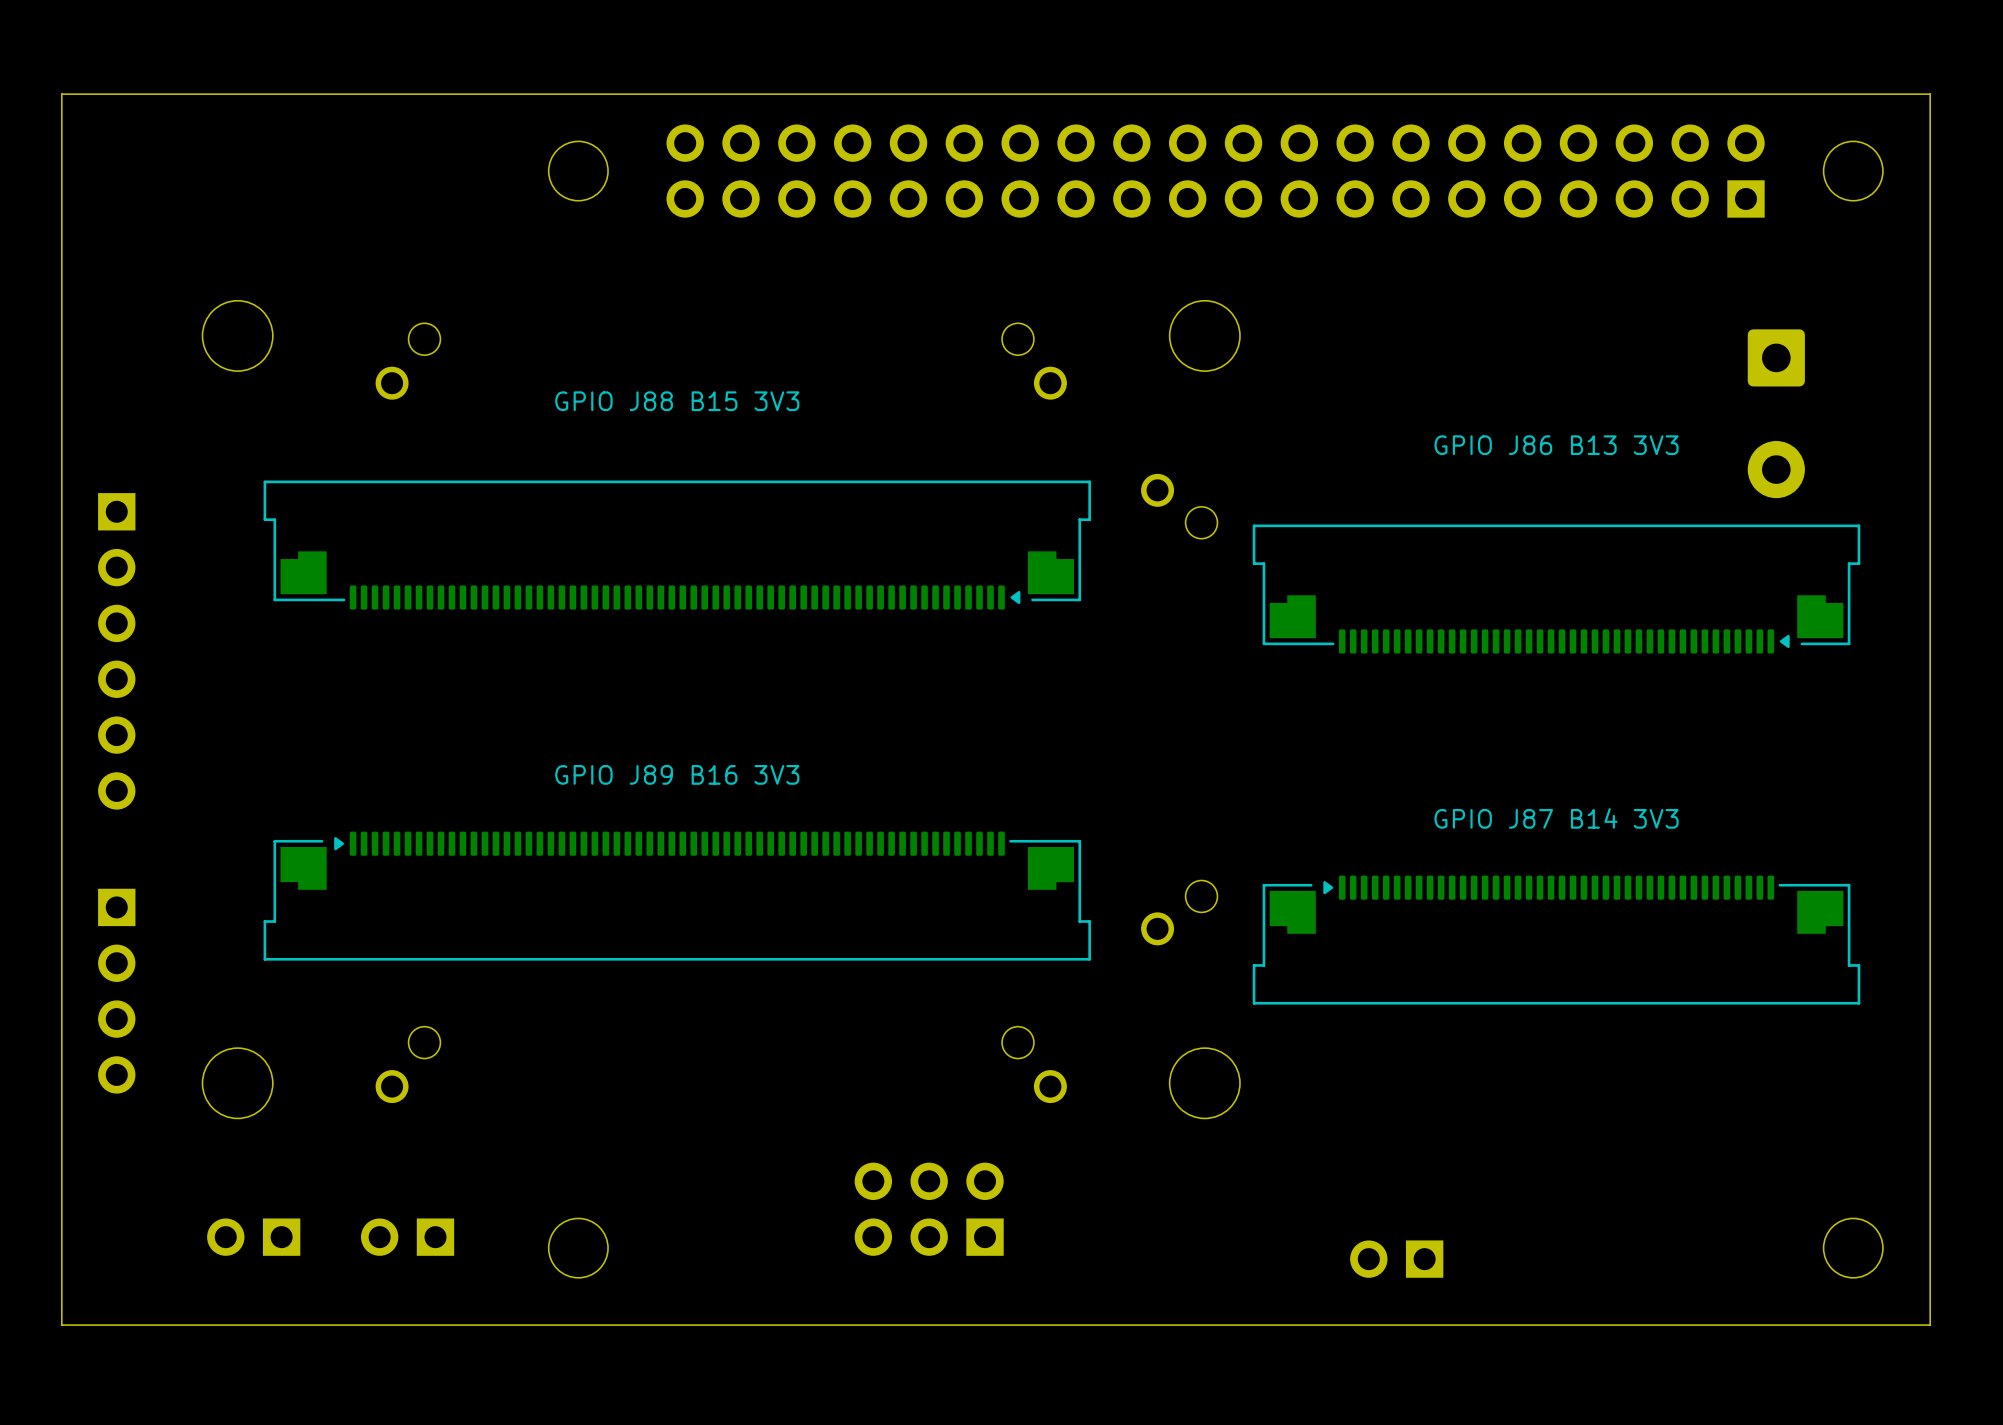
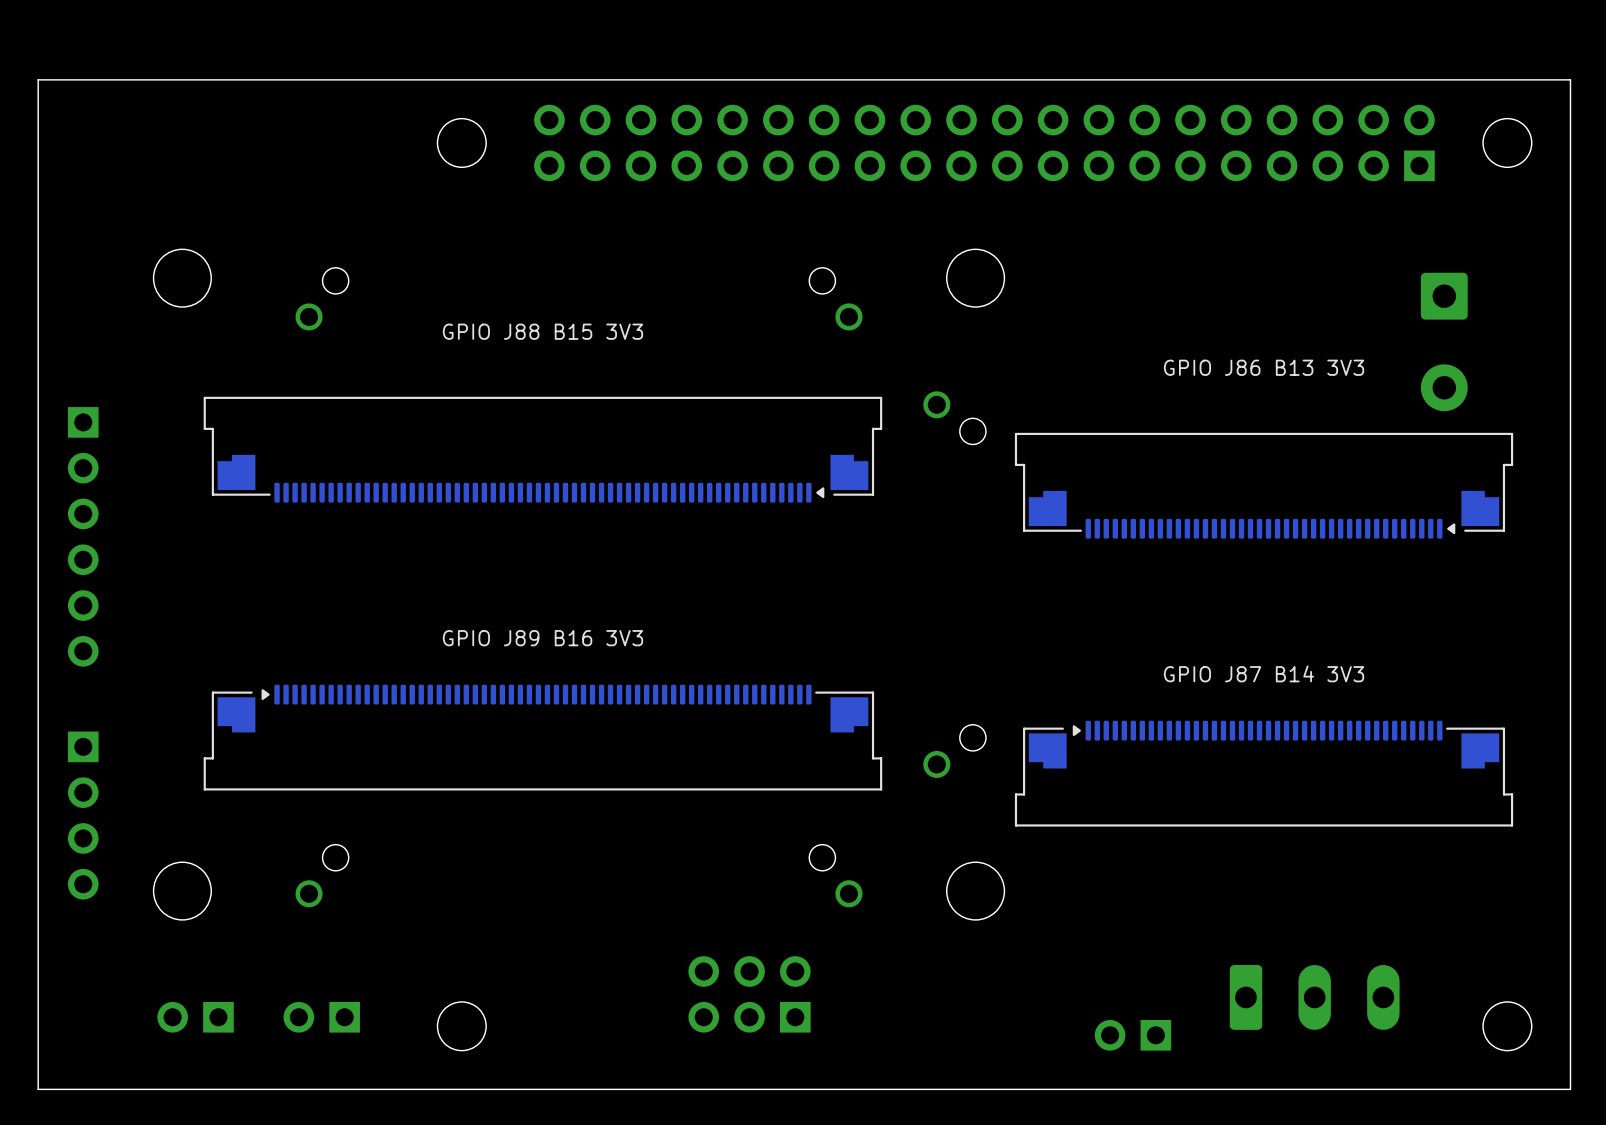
part: none -> (1314, 997)

